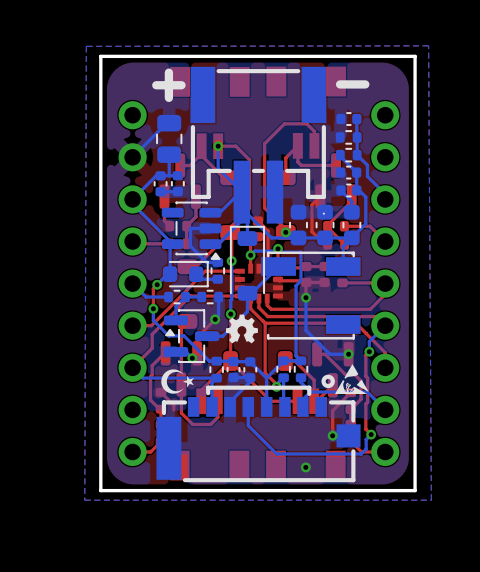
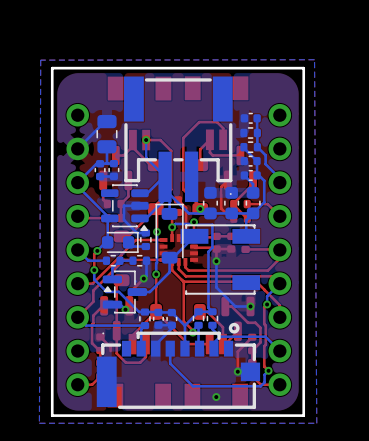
text: - (352, 84) -> none
text: + (168, 85) -> none
drawing: [225, 314, 258, 344] -> none
drawing: [334, 364, 369, 395] -> none
drawing: [161, 369, 194, 394] -> none

